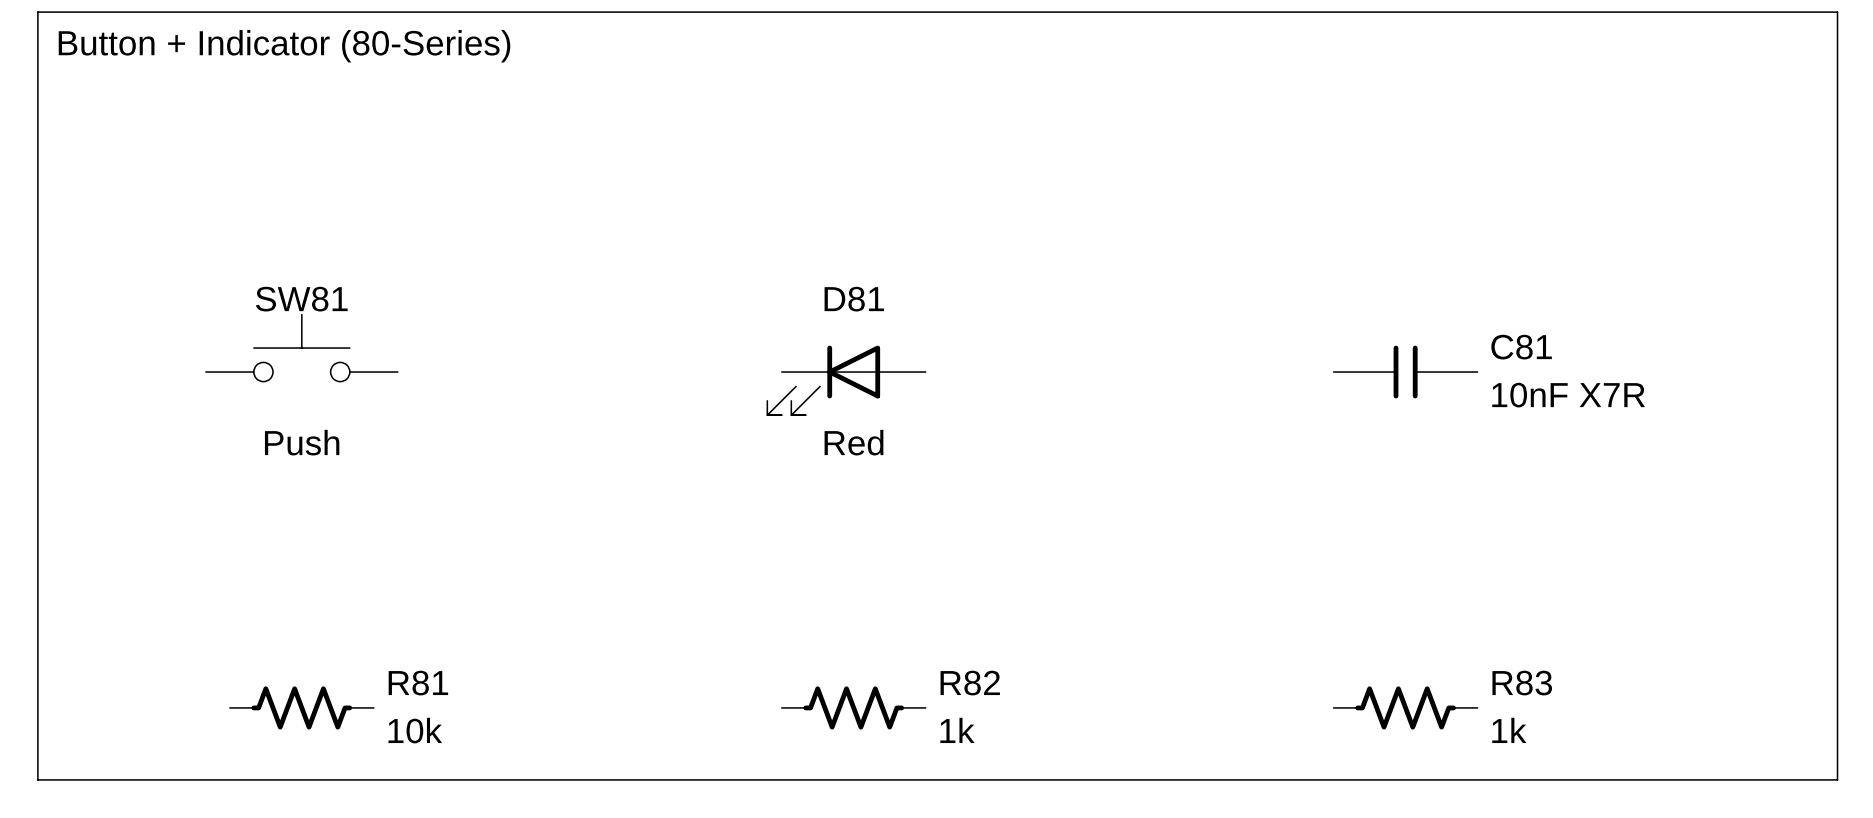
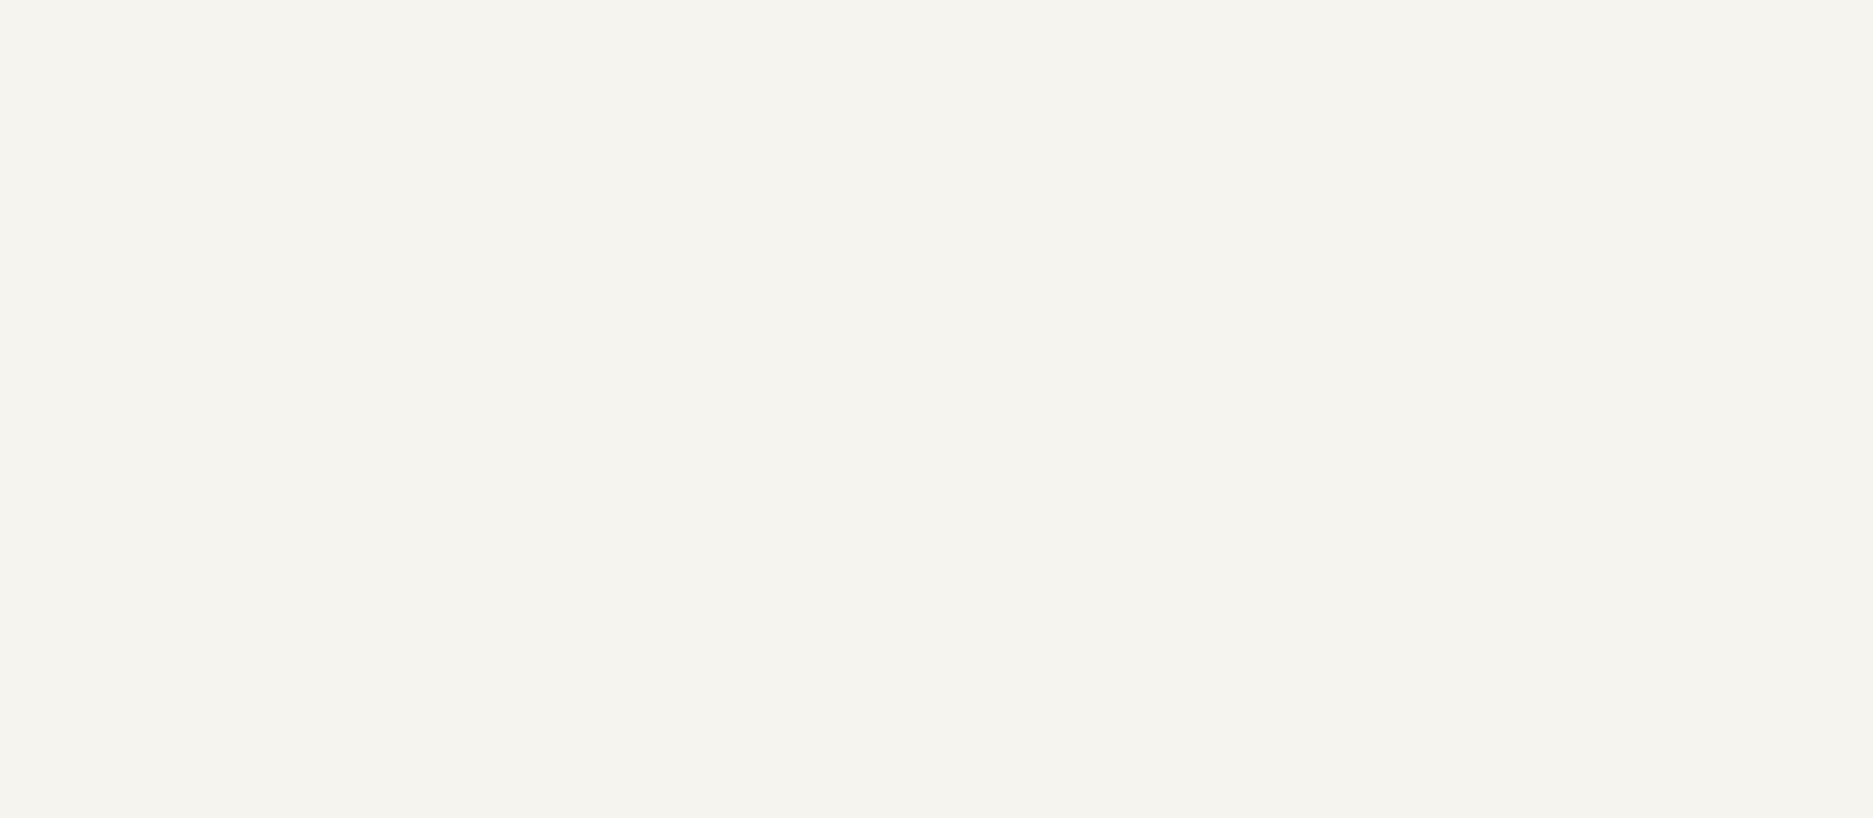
line: (37, 12) (1837, 12) (1837, 779) (37, 779) (37, 12) -> none
text: Button + Indicator (80-Series) (284, 46) -> none
SW81: Push (301, 348) -> none
C81: 10nF X7R (1405, 372) -> none
D81: Red (846, 380) -> none
R81: 10k (301, 707) -> none
R82: 1k (853, 707) -> none
R83: 1k (1405, 707) -> none

